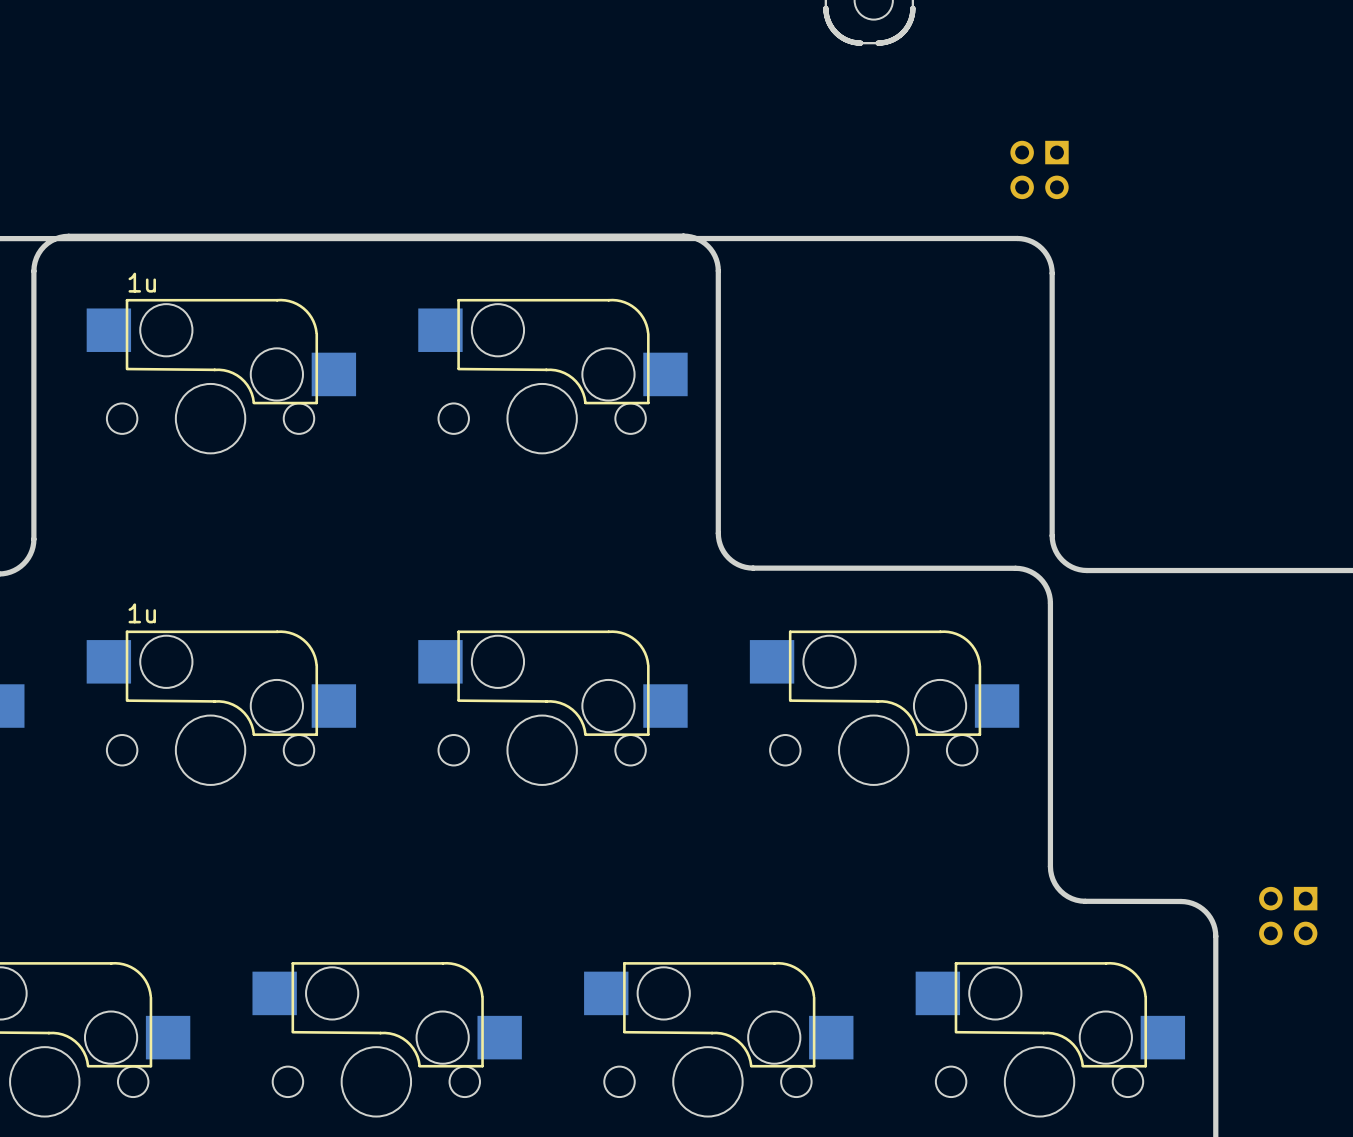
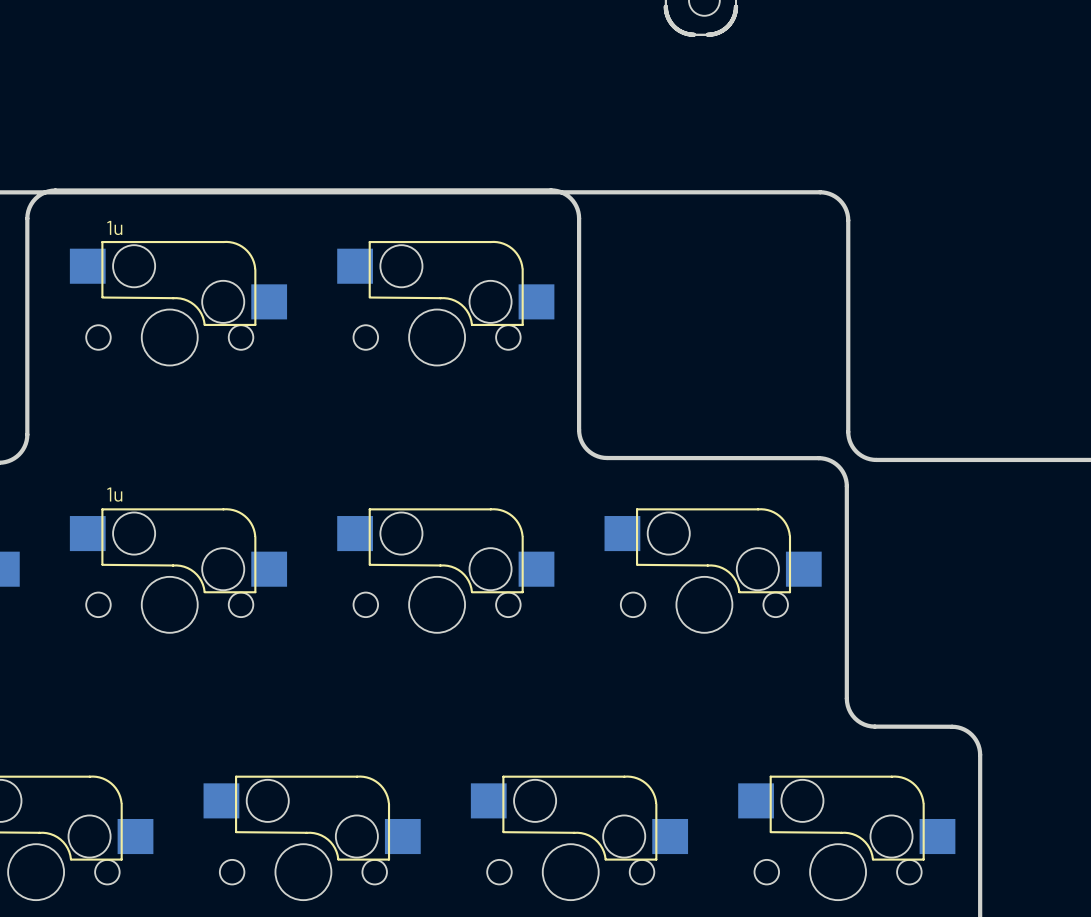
part: (1039, 169) -> none
part: (1288, 916) -> none

